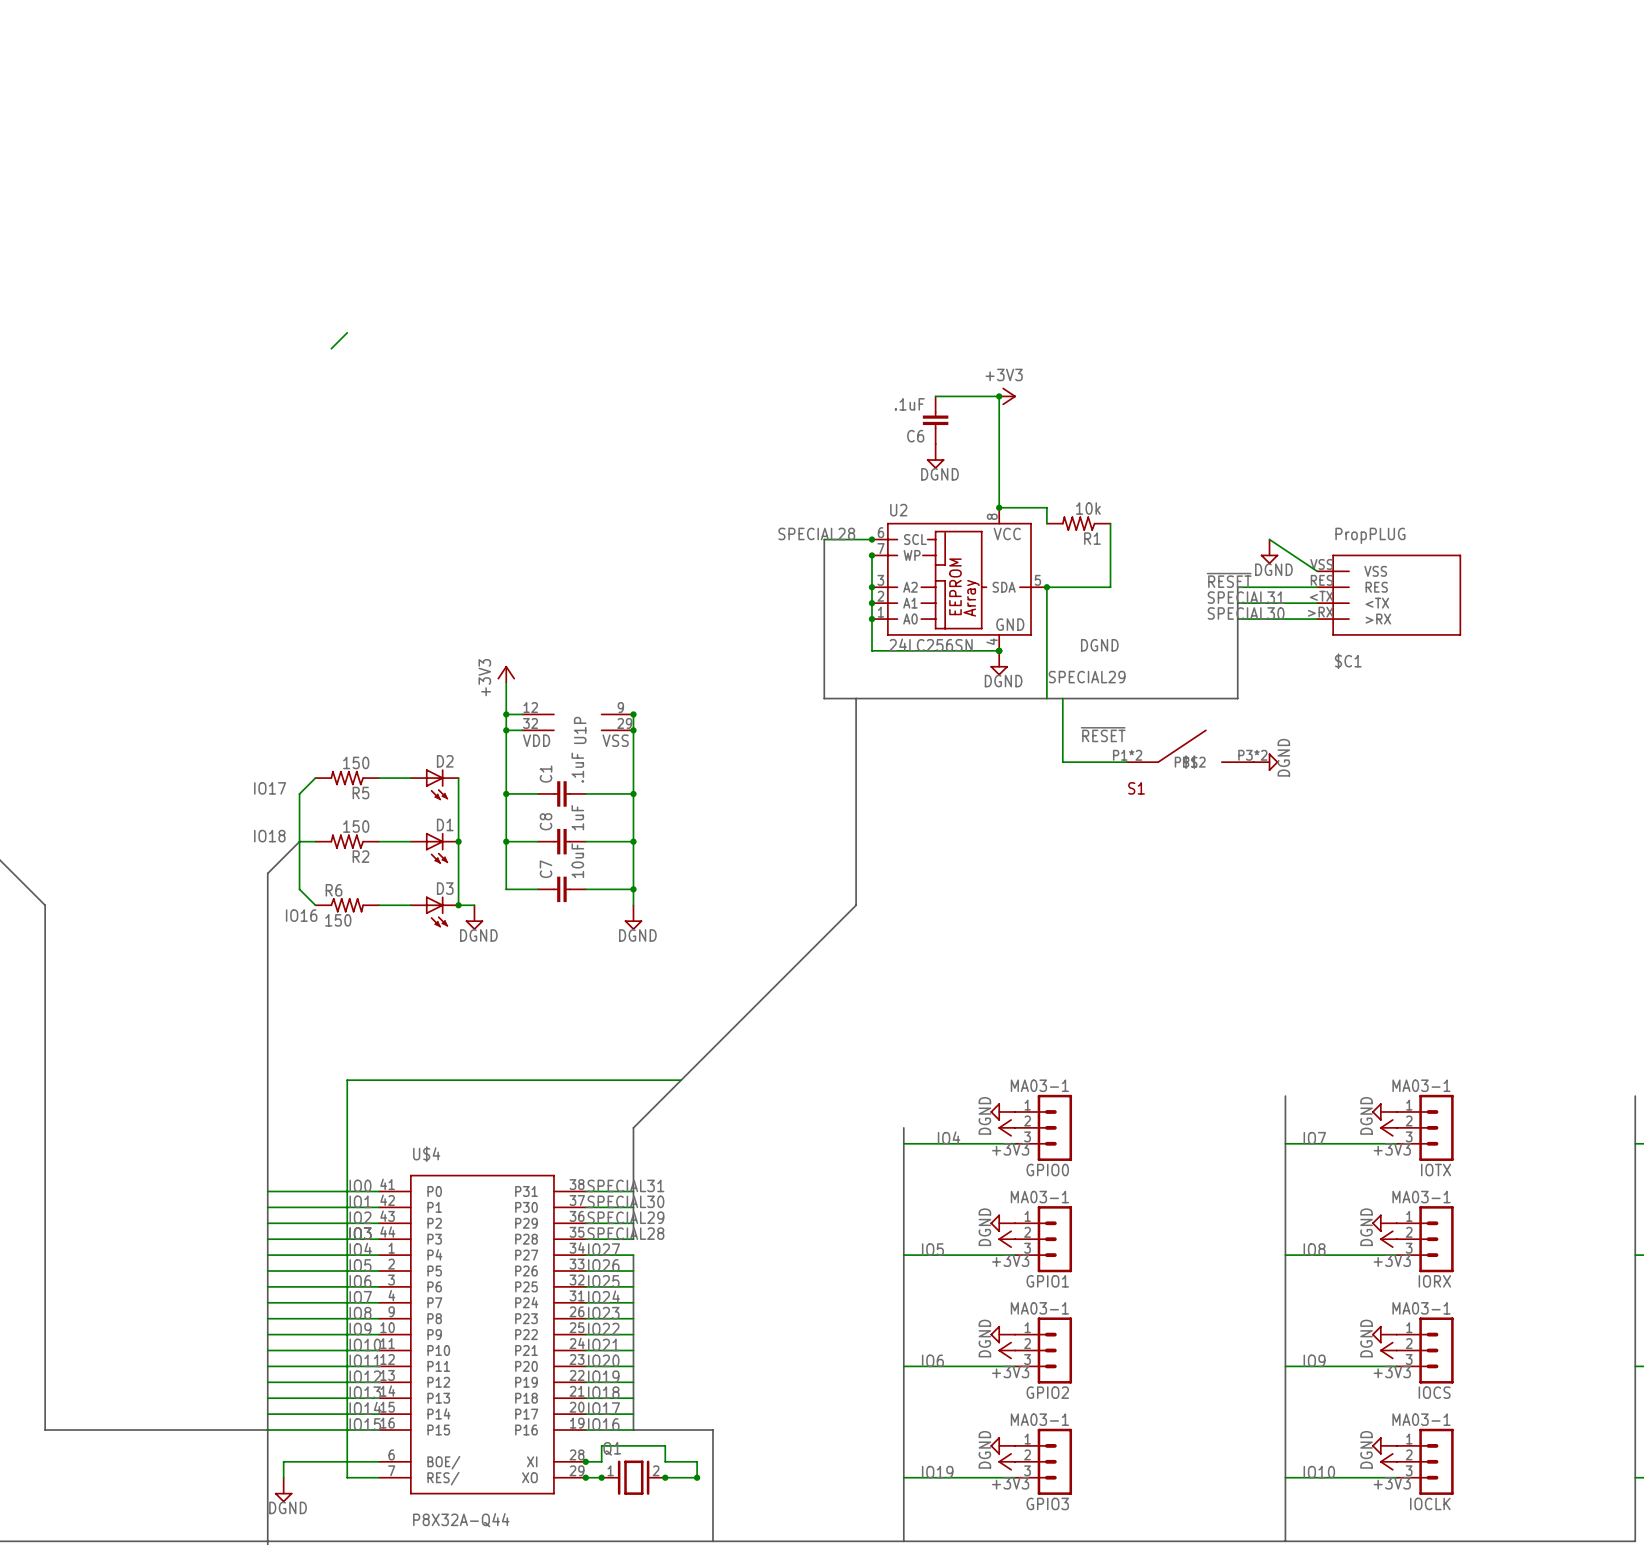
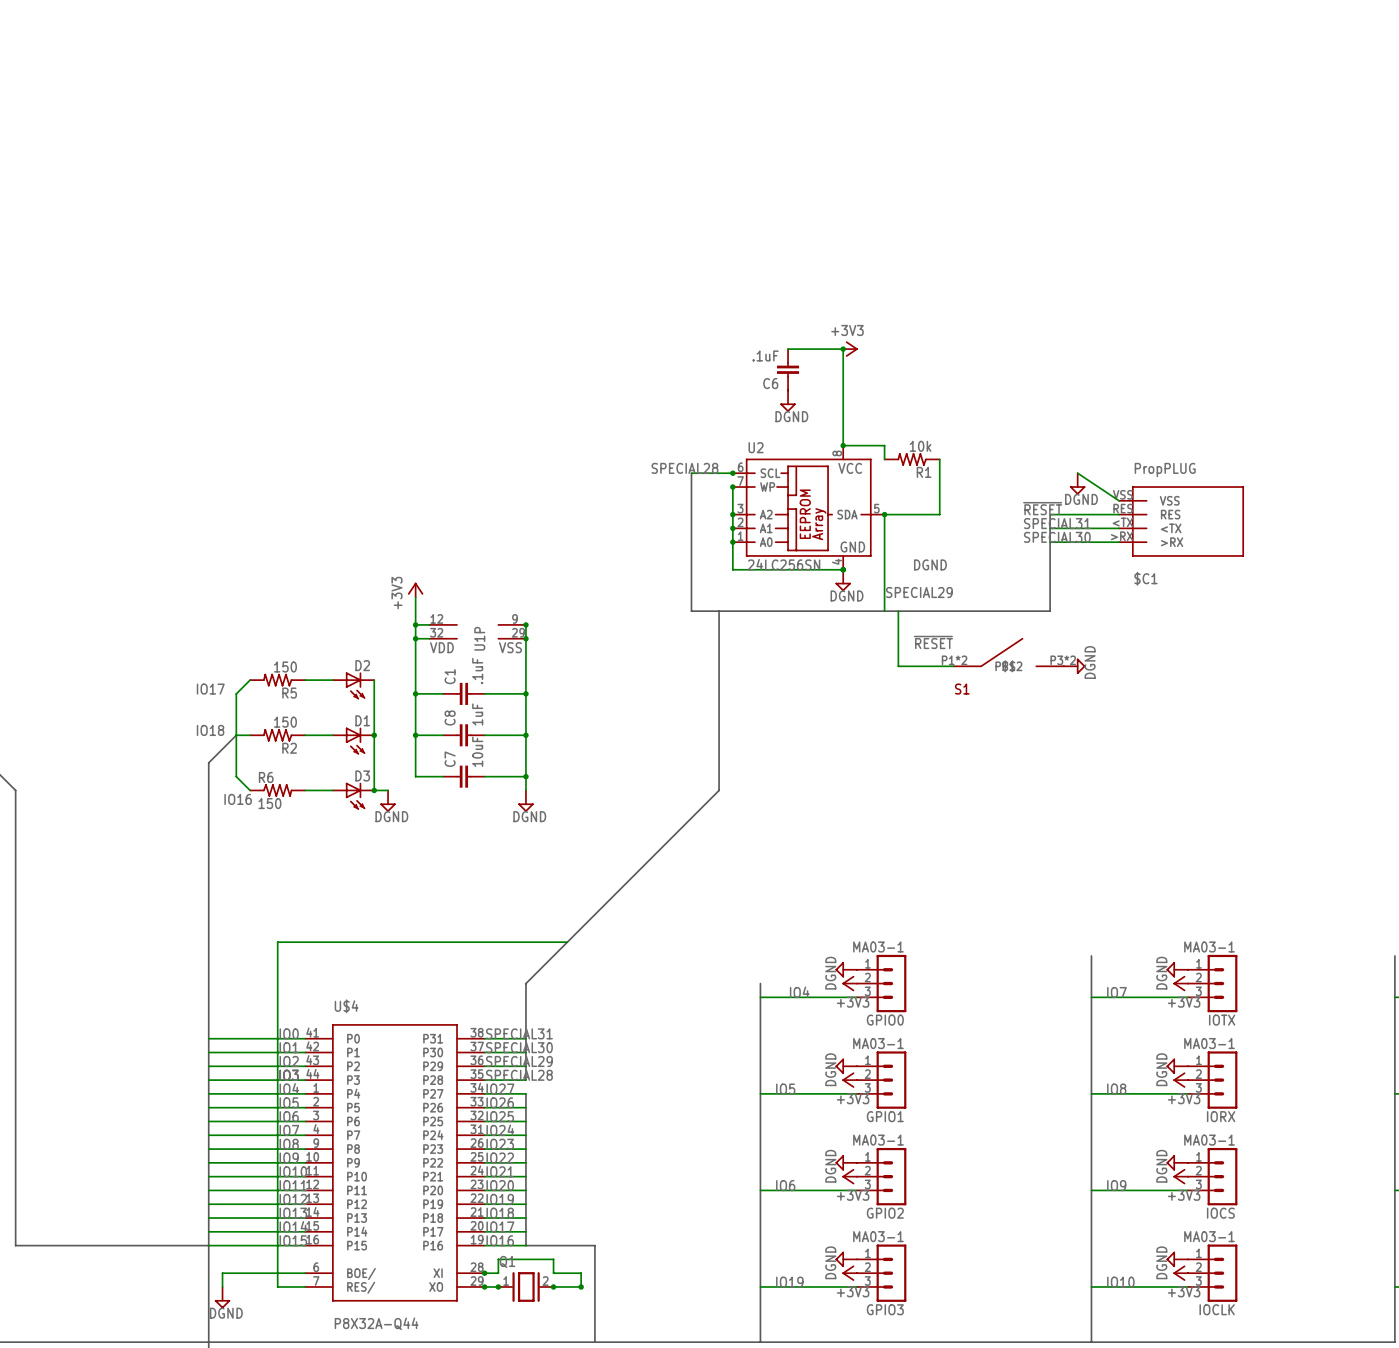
wire: (347, 332) (331, 348) -> none

